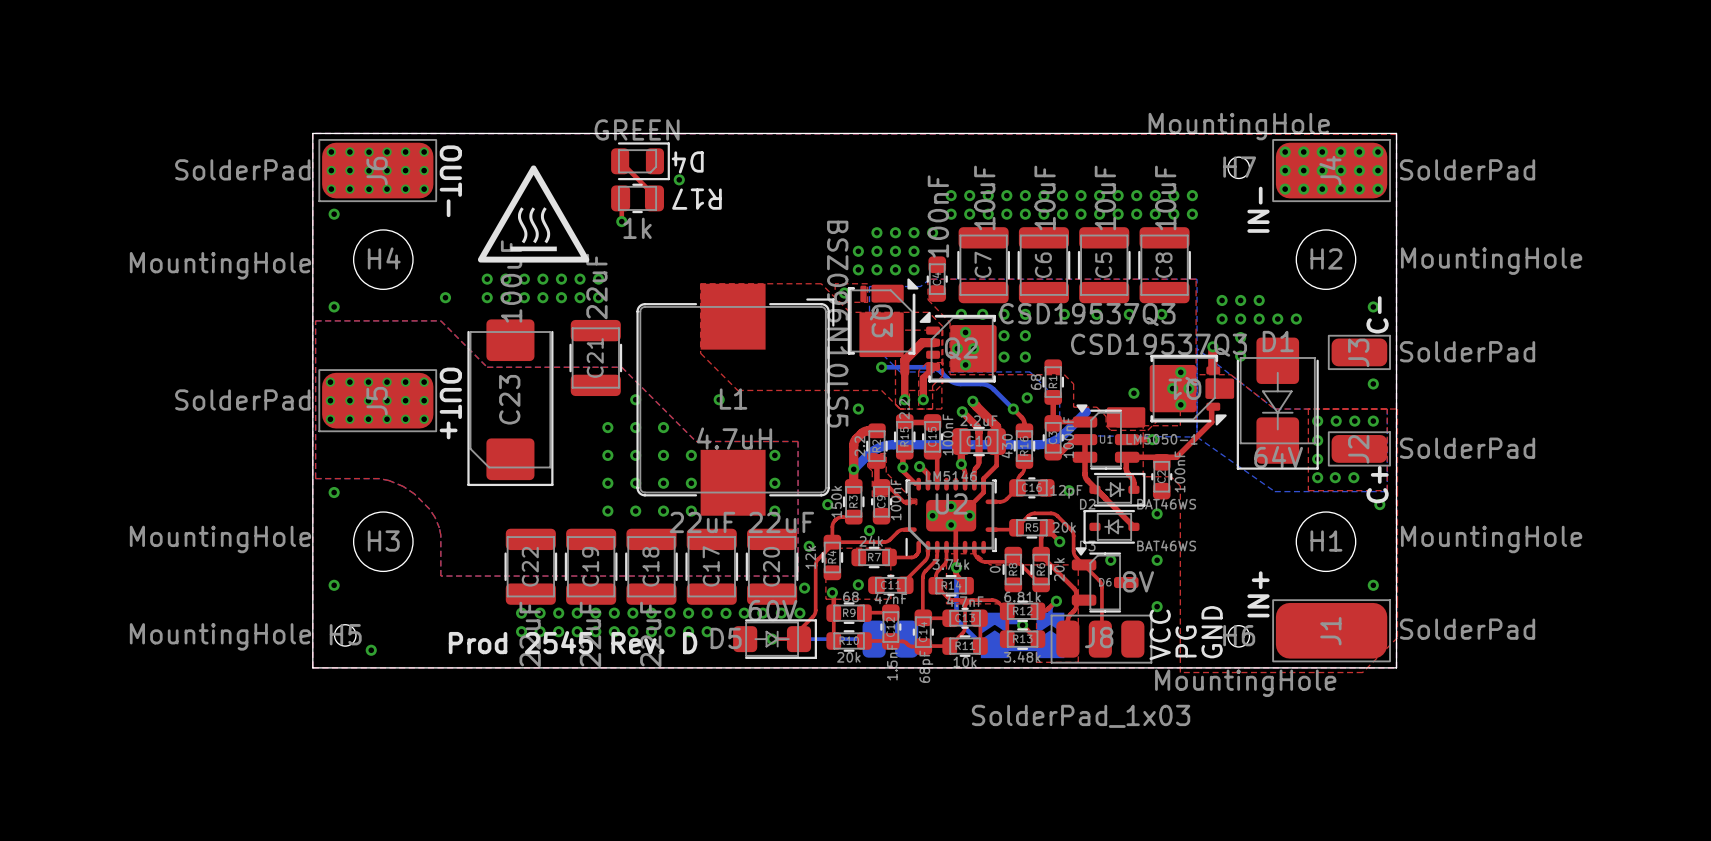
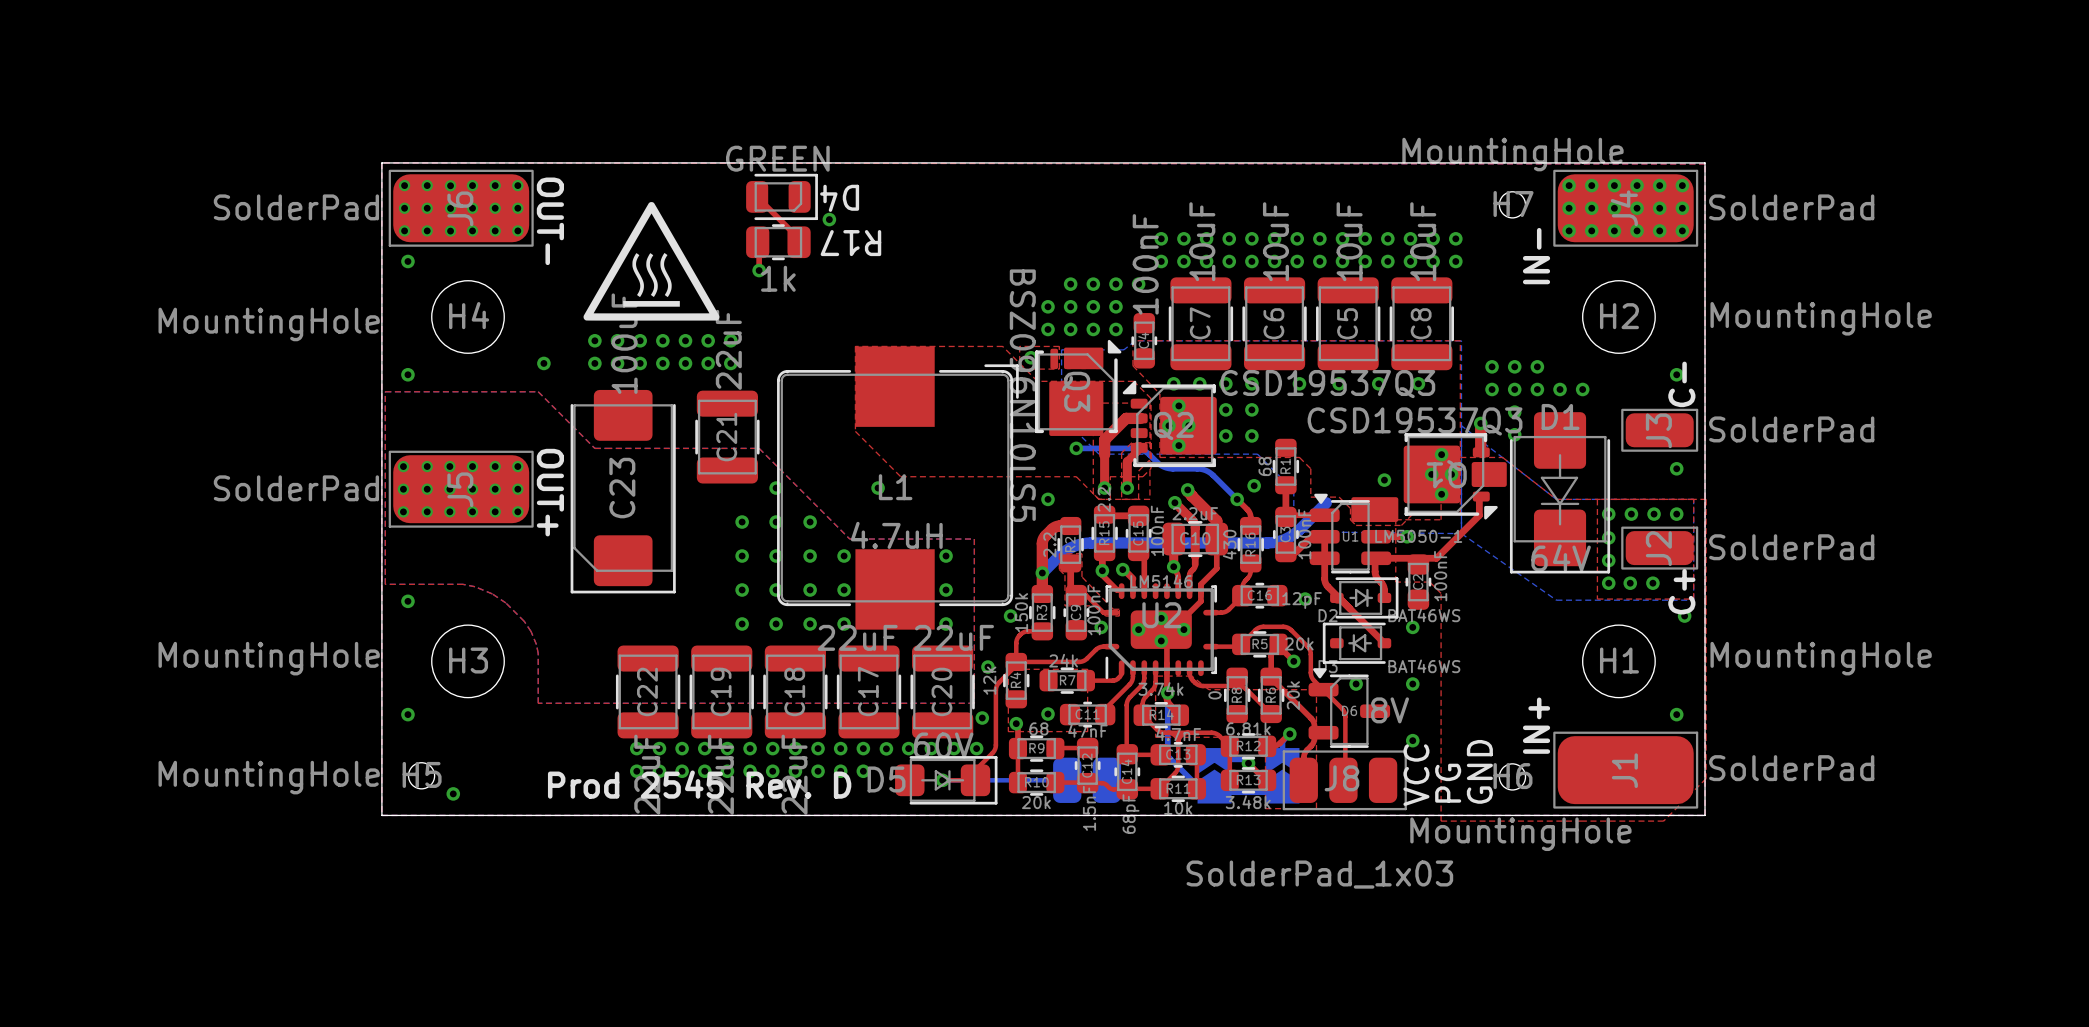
via position: (869, 530) -> (1101, 627)

